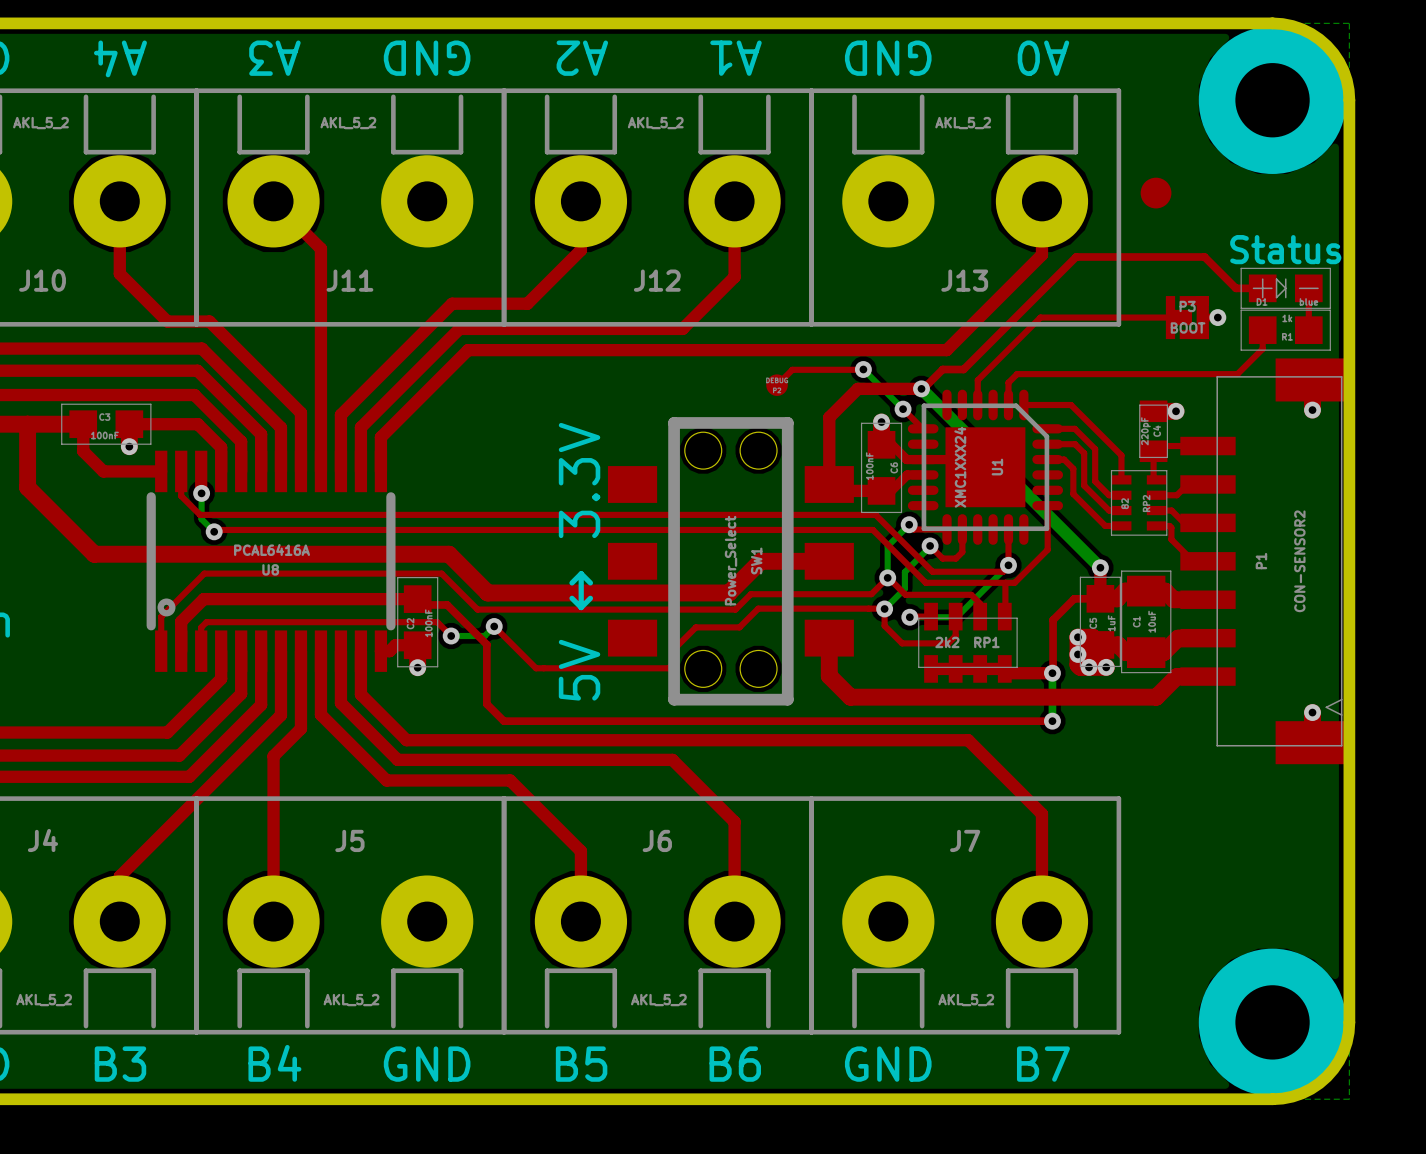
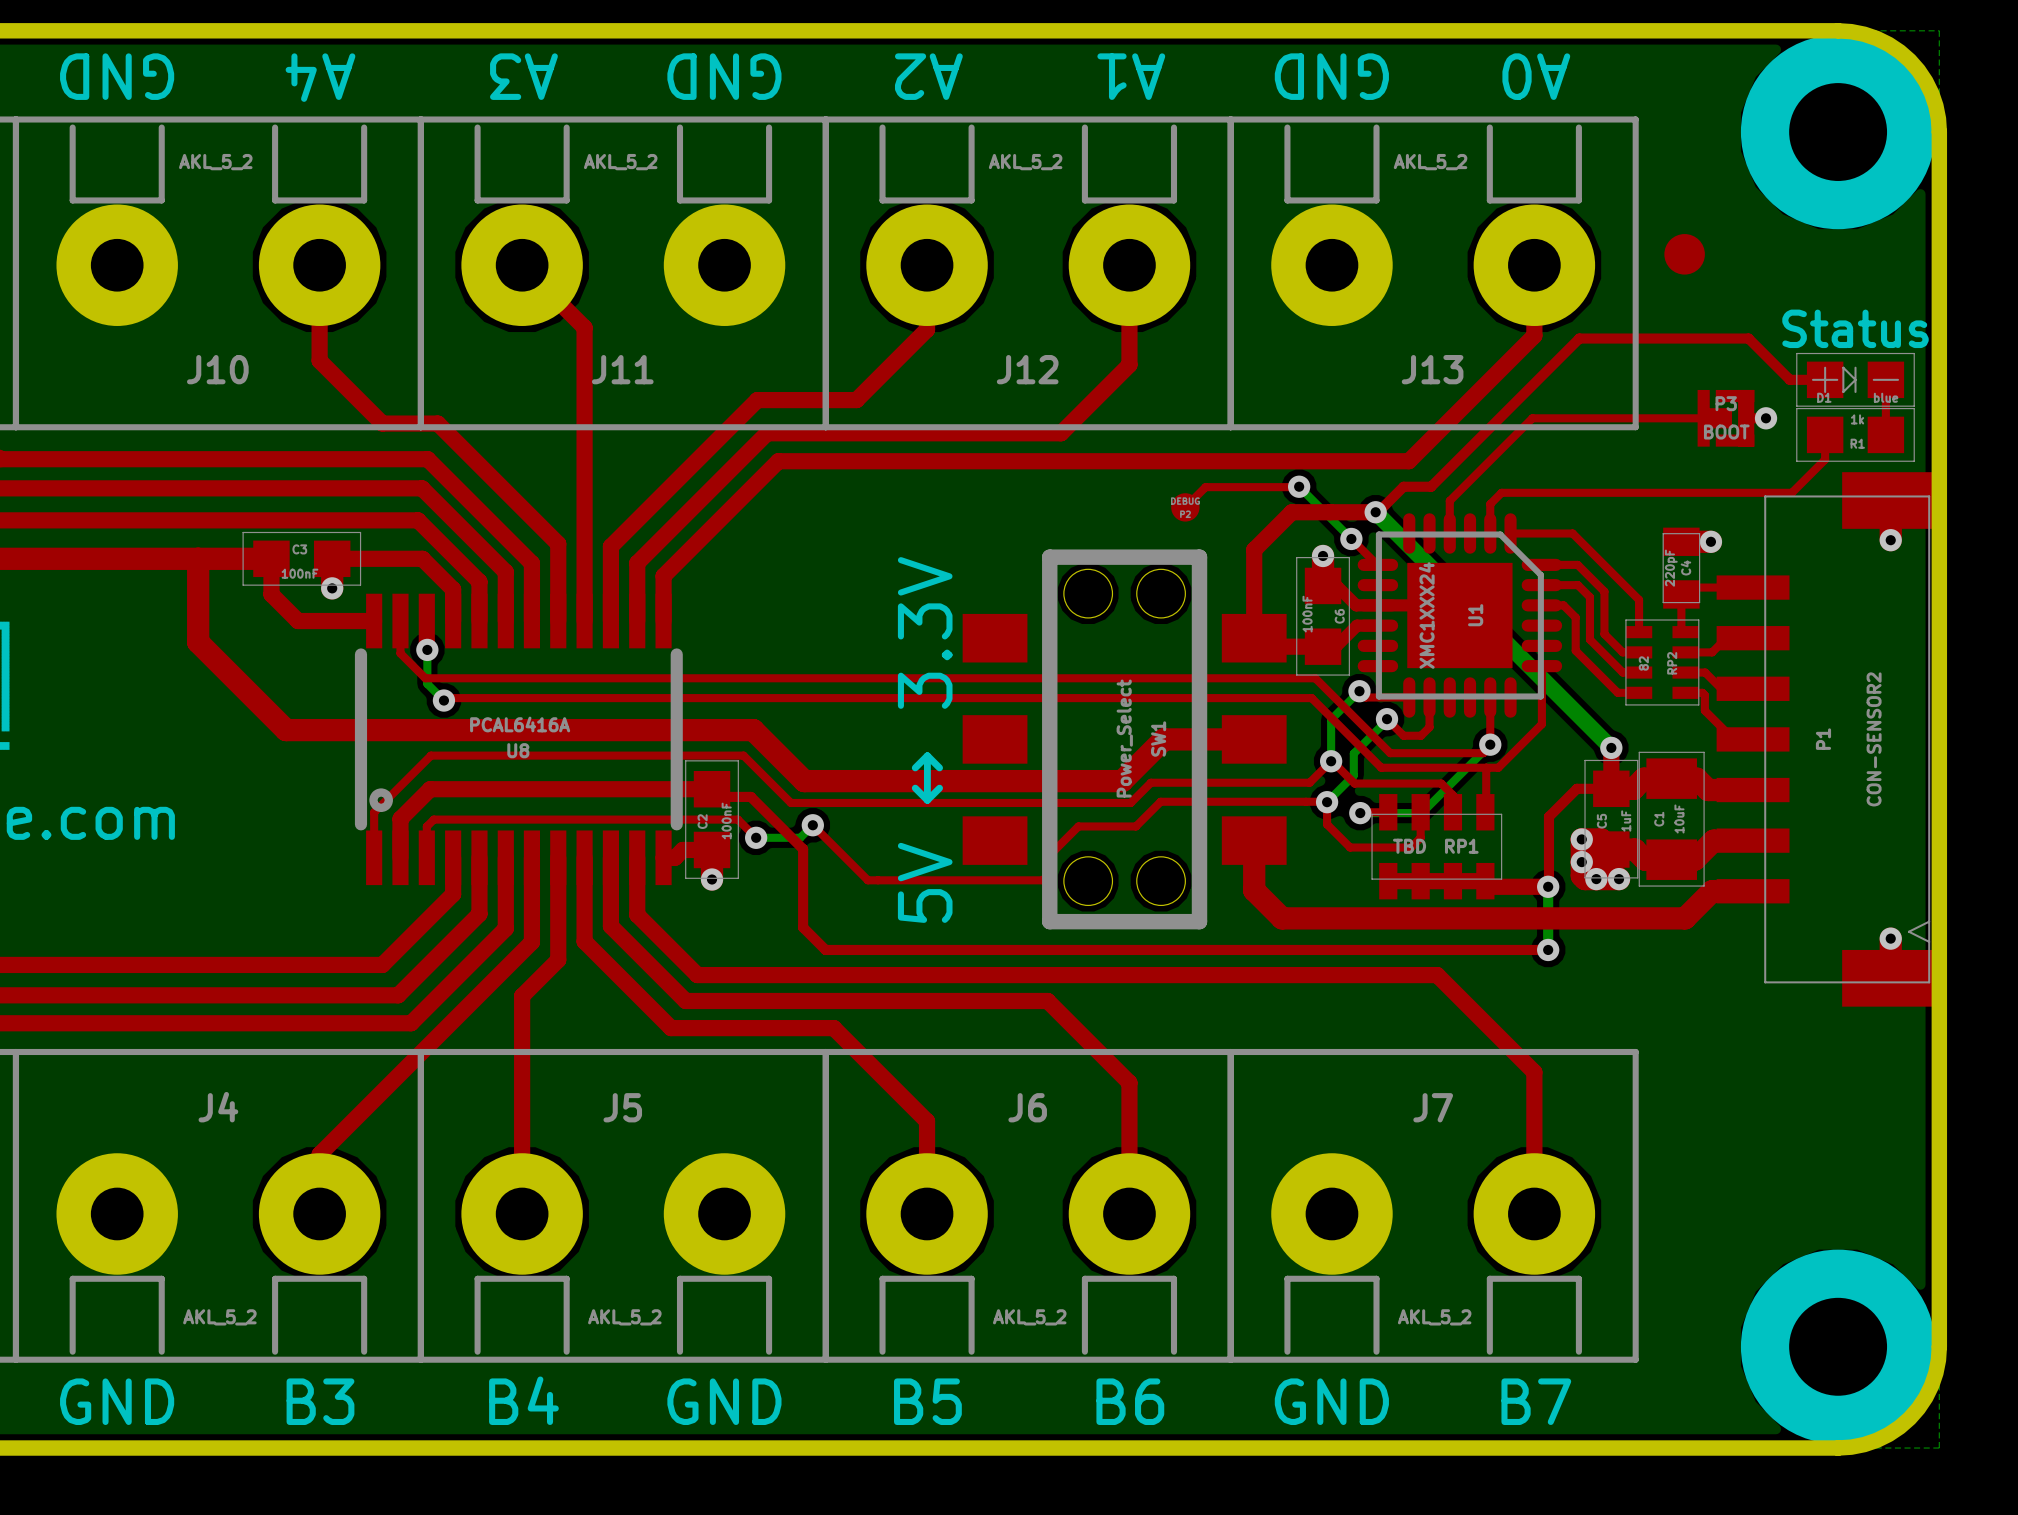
RP1 value: 2k2 (947, 642) -> TBD (1409, 846)

